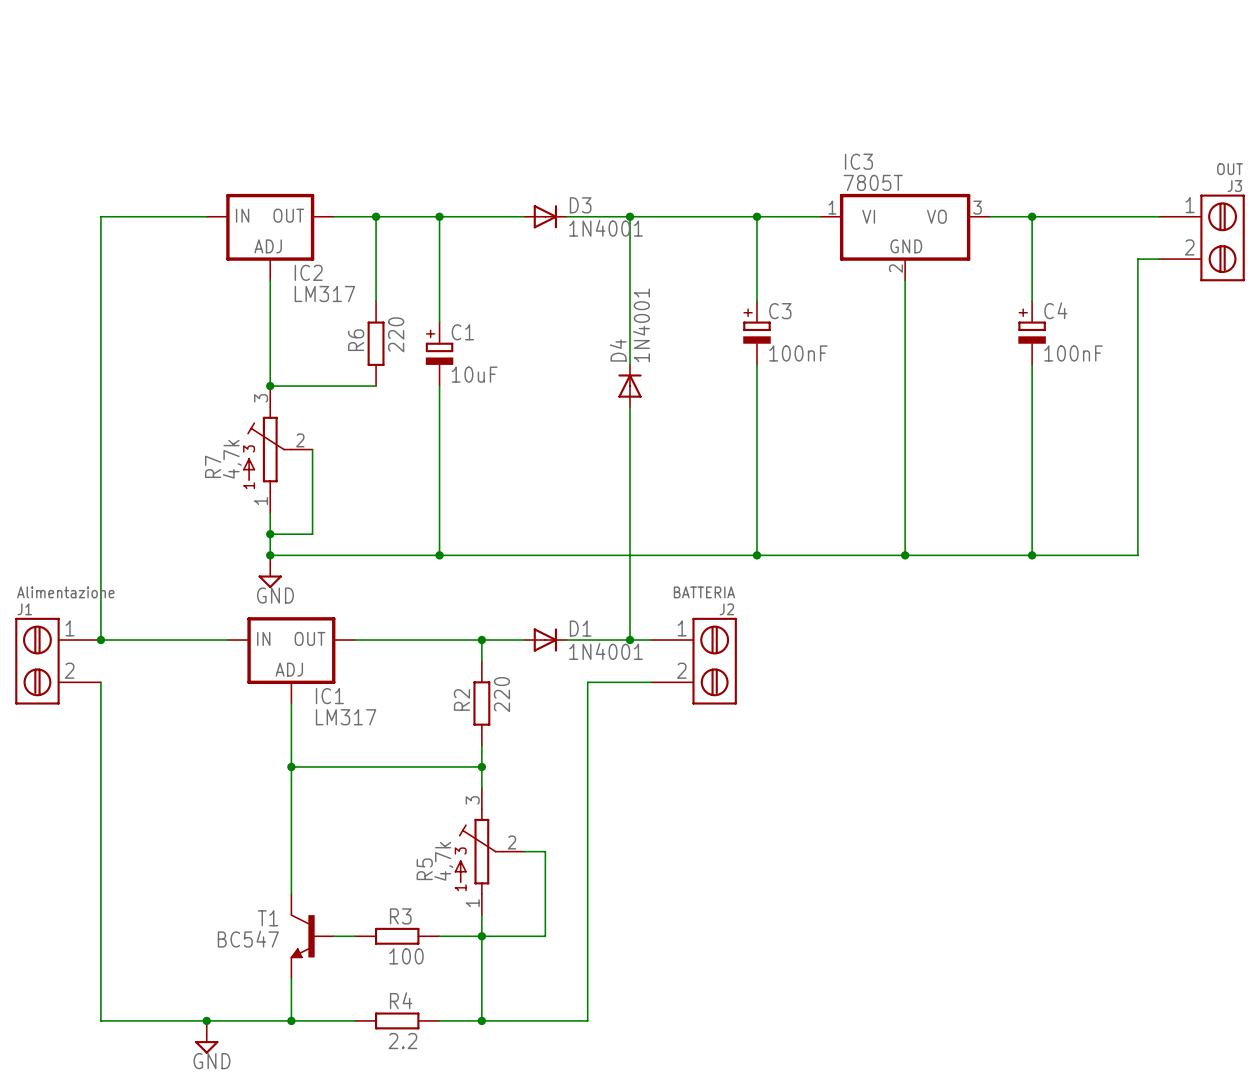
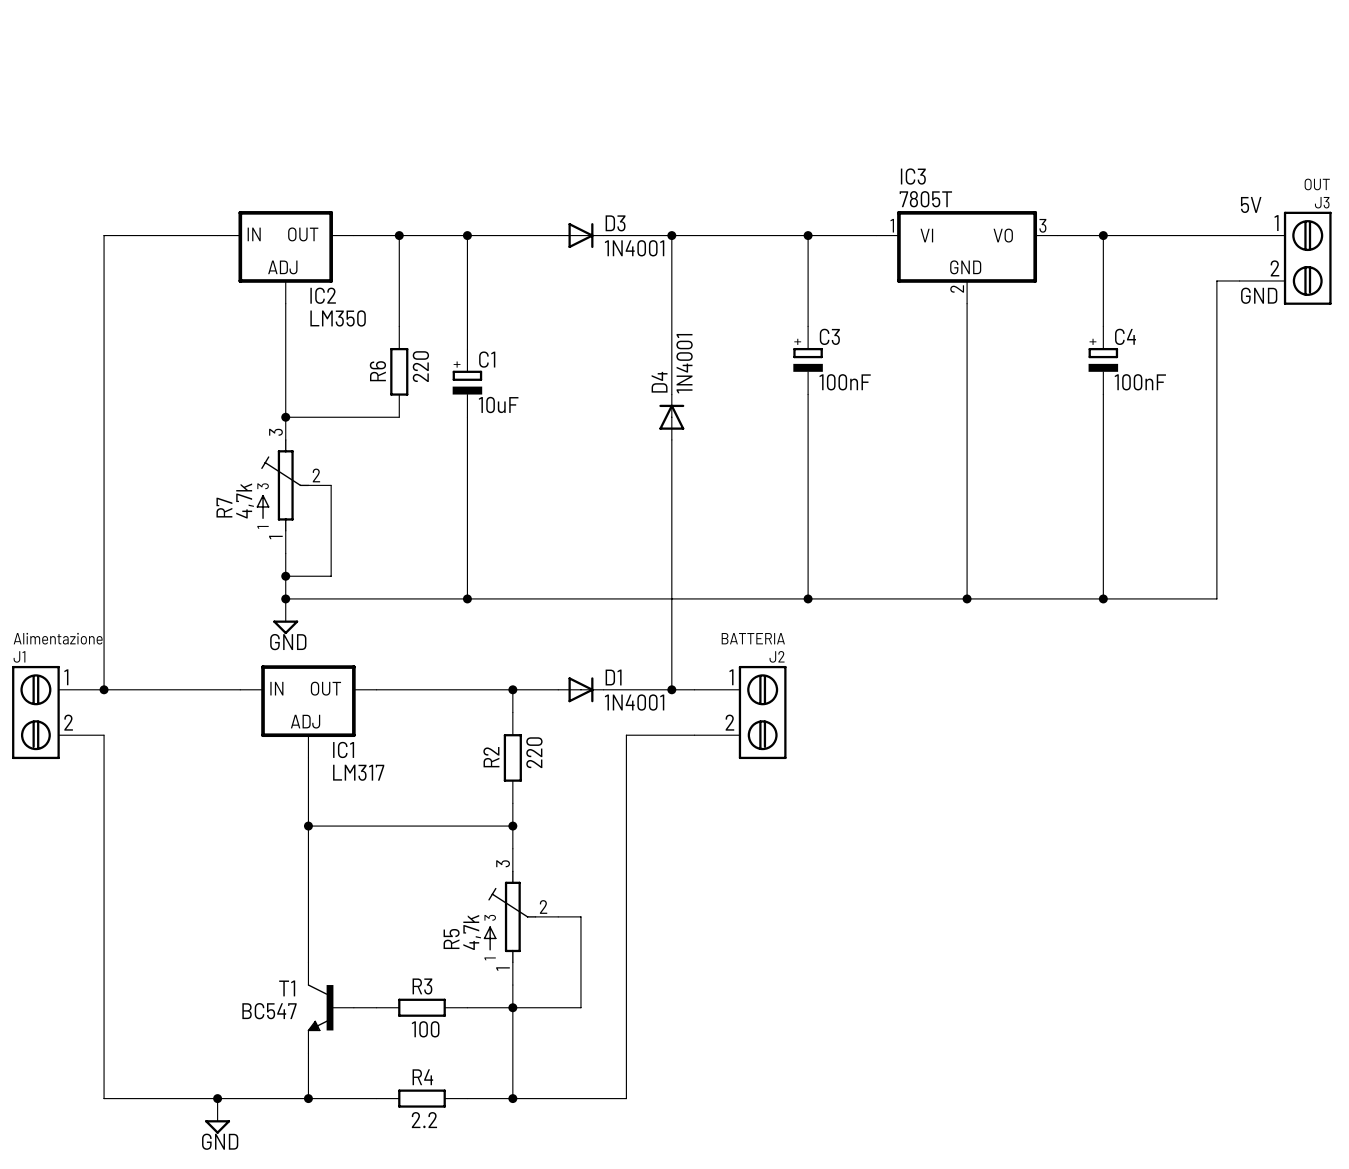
label: none -> 5V (1251, 204)
label: none -> GND (1259, 295)
IC2 value: LM317 (324, 294) -> LM350 (338, 318)

